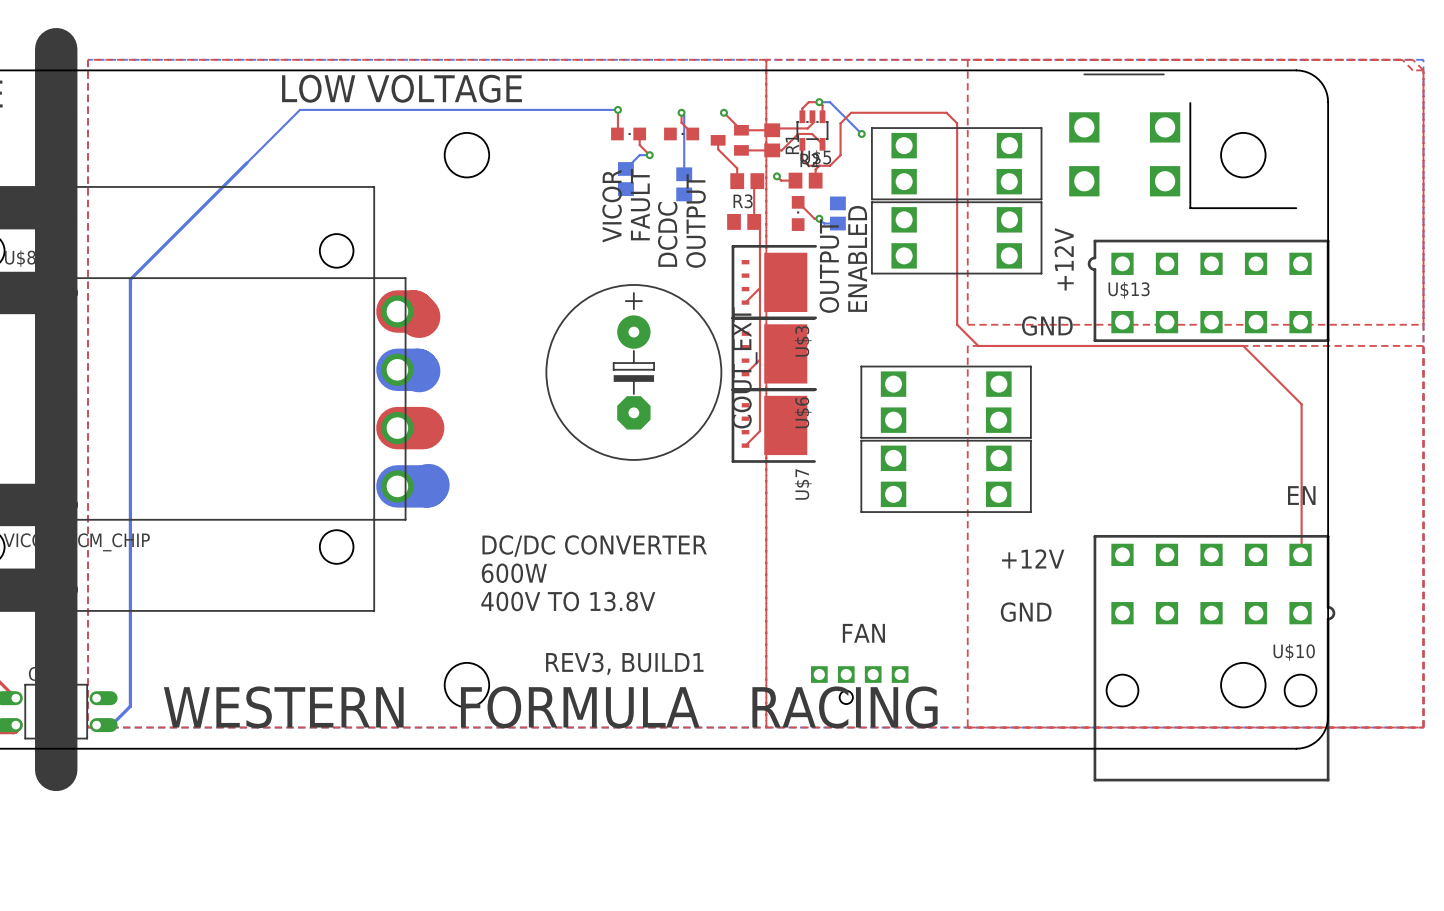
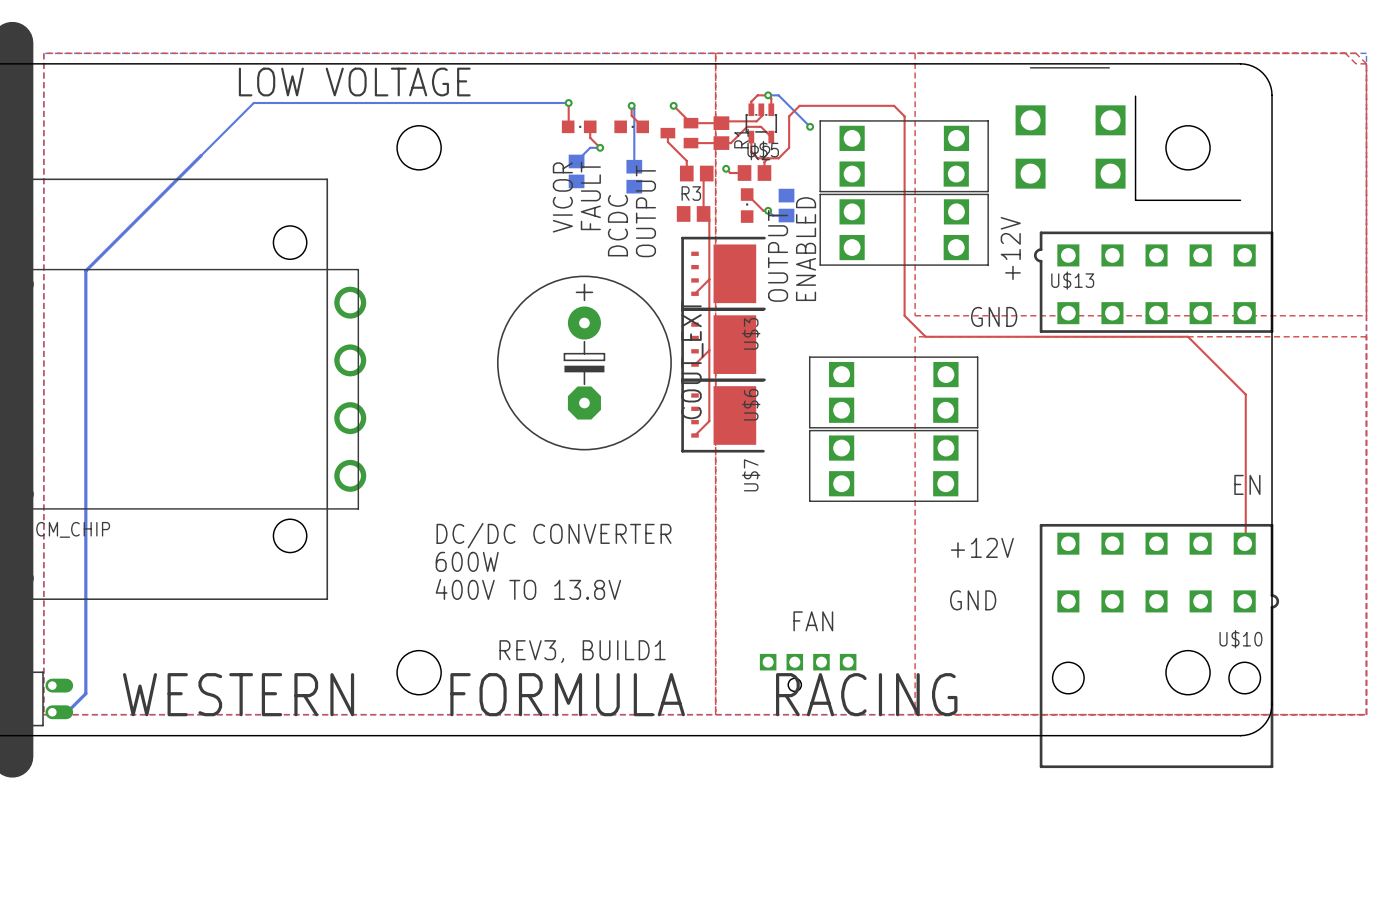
top track: (397, 311) (413, 311) (419, 316) -> none
bottom track: (397, 369) (419, 371) -> none
top track: (397, 428) (423, 428) -> none
bottom track: (428, 485) (397, 486) -> none

